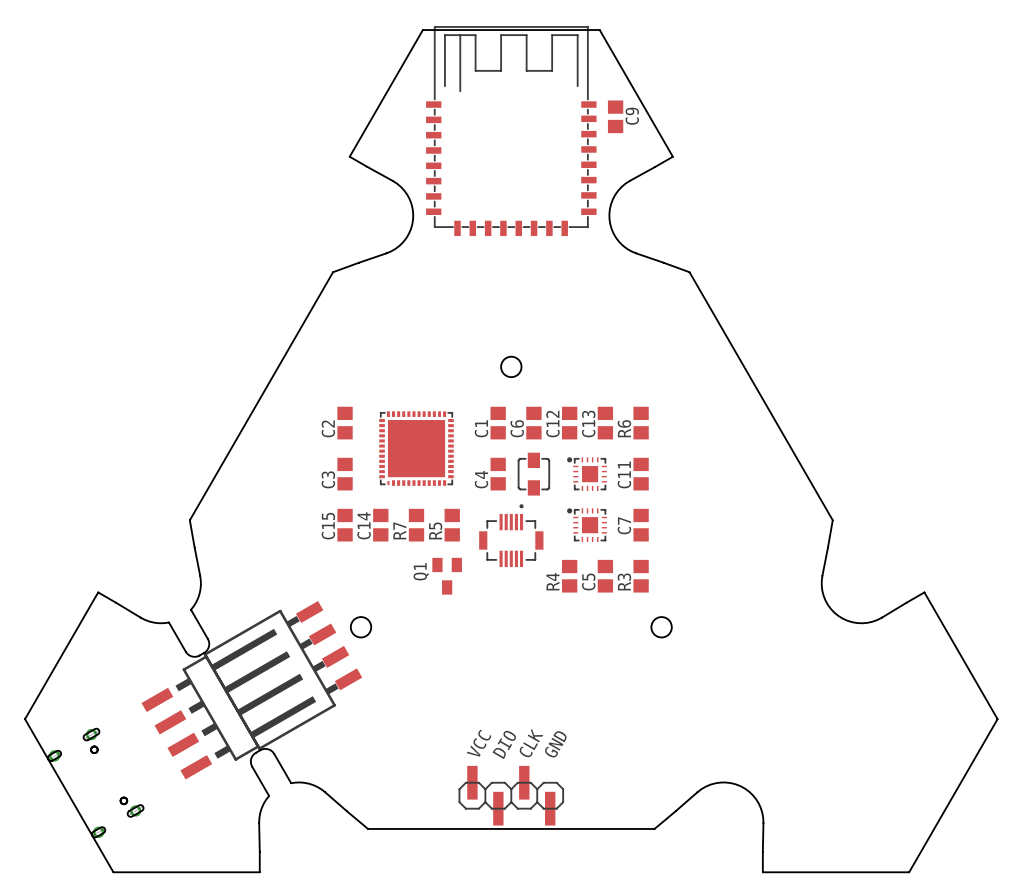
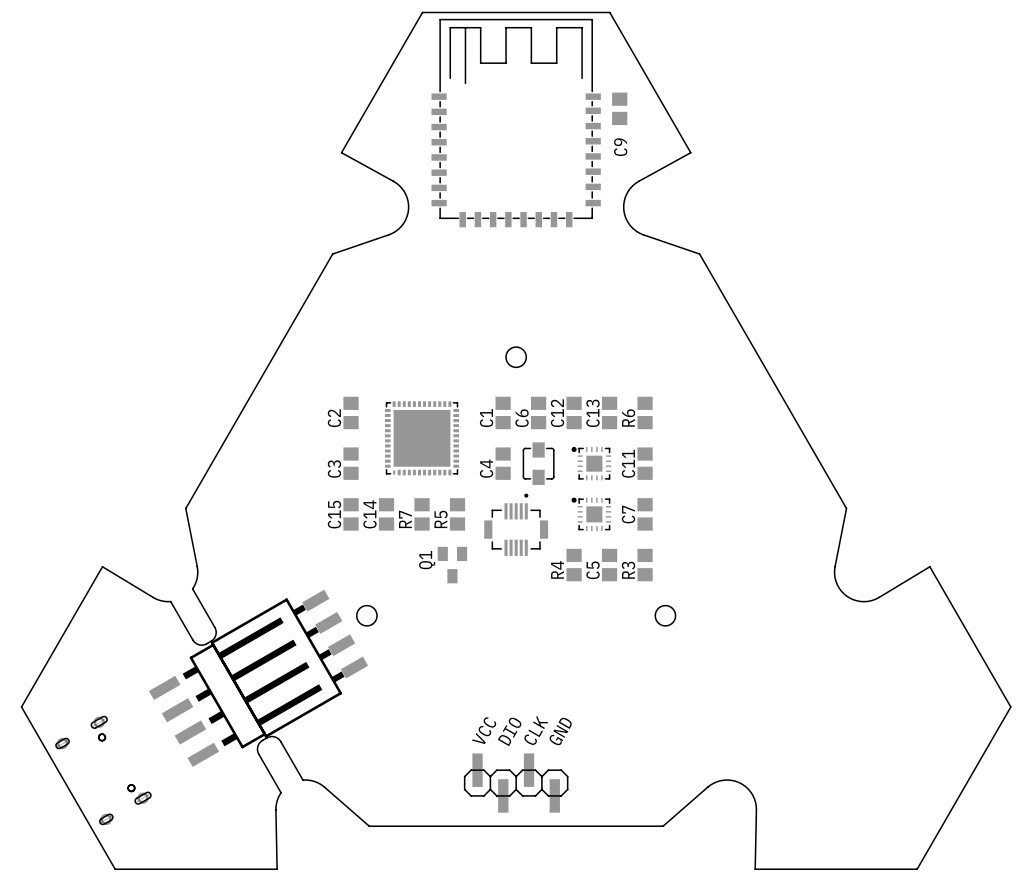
C9 name position: C9 (632, 116) -> C9 (620, 147)
board edge: (191, 609) (198, 598) (200, 584) (189, 520) (333, 272) (391, 251) (403, 242) (410, 229) (412, 208) (404, 190) (392, 180) (349, 156) (422, 30) (599, 30) (672, 156) (629, 180) (618, 190) (609, 208) (611, 229) (619, 242) (631, 251) (689, 272) (832, 520) (821, 580) (823, 595) (828, 605) (843, 618) (852, 622) (867, 622) (882, 617) (924, 592) (997, 719) (909, 872) (762, 872) (763, 823) (760, 808) (749, 791) (730, 783) (715, 783) (701, 789) (654, 828) (368, 828) (317, 787) (304, 782) (291, 783) -> (198, 598) (192, 588) (197, 578) (197, 569) (185, 508) (332, 254) (392, 233) (401, 226) (406, 216) (407, 198) (399, 185) (341, 152) (422, 12) (609, 12) (690, 152) (632, 185) (624, 202) (626, 220) (640, 233) (699, 254) (846, 508) (834, 570) (836, 581) (841, 591) (857, 600) (872, 600) (929, 566) (1010, 707) (917, 869) (755, 869) (755, 802) (748, 789) (732, 780) (721, 780) (710, 784) (663, 826) (369, 826) (322, 785) (314, 781) (302, 780) (297, 770)
board edge: (168, 622) (154, 622) (144, 619) (98, 592) (25, 719) (113, 872) (259, 872) (259, 818) (263, 804) (269, 795) -> (176, 611) (170, 601) (155, 598) (102, 566) (21, 707) (115, 869) (277, 869) (276, 806) (281, 792) (275, 783)

